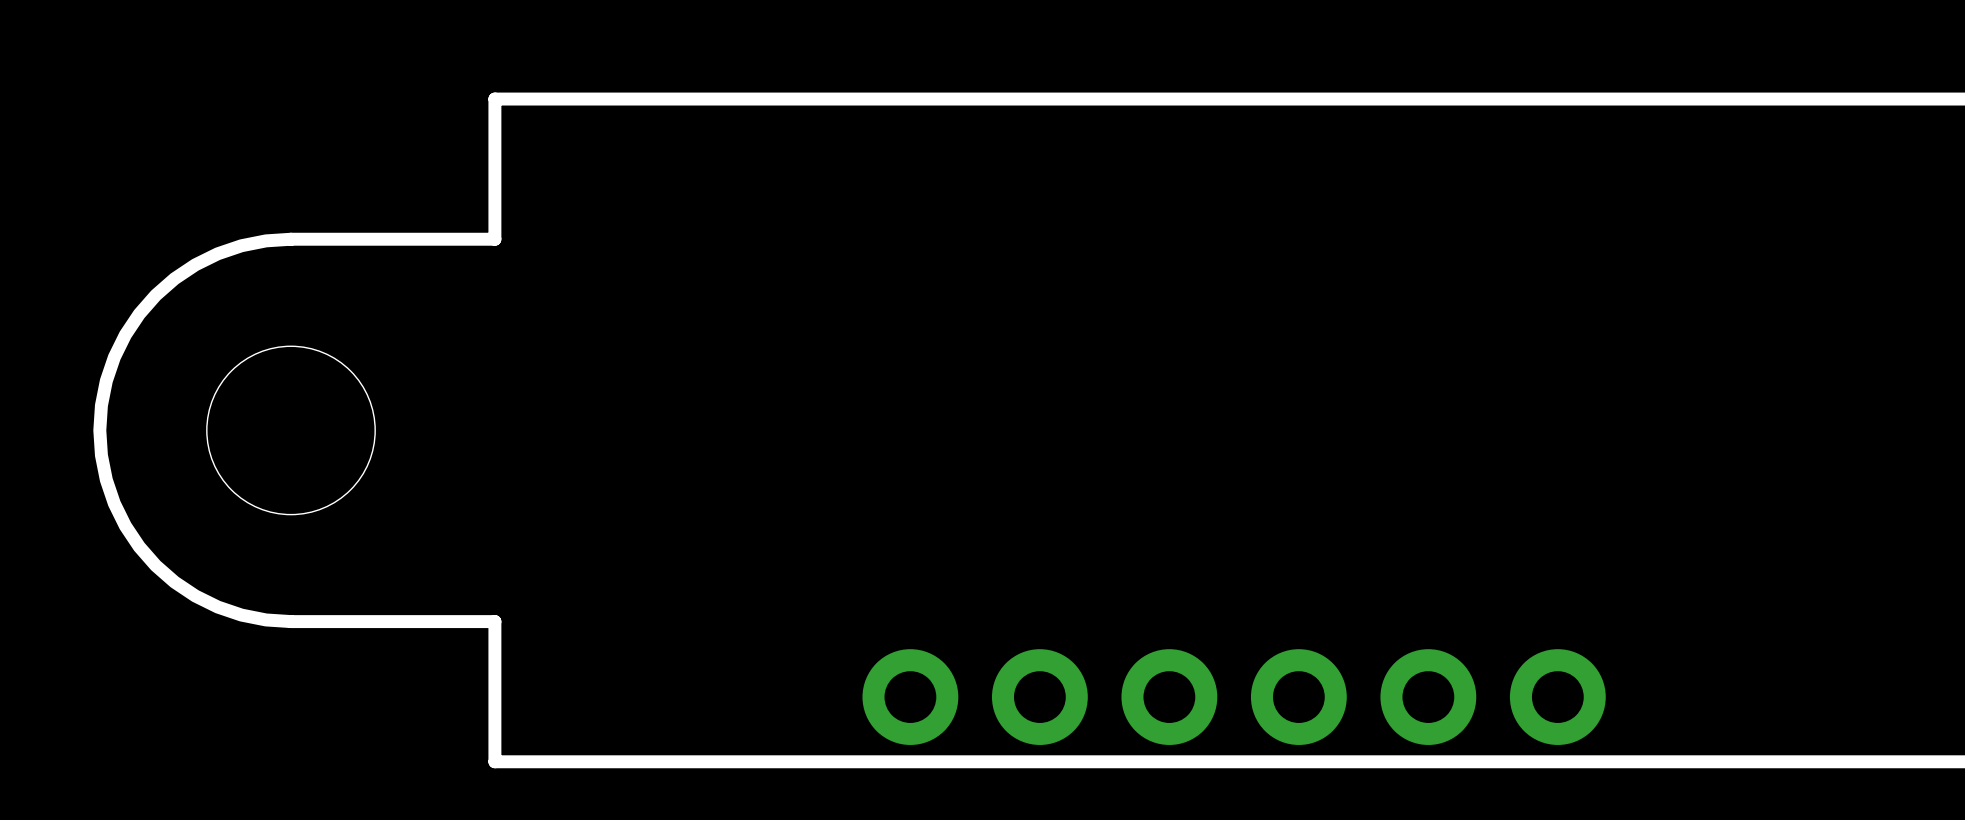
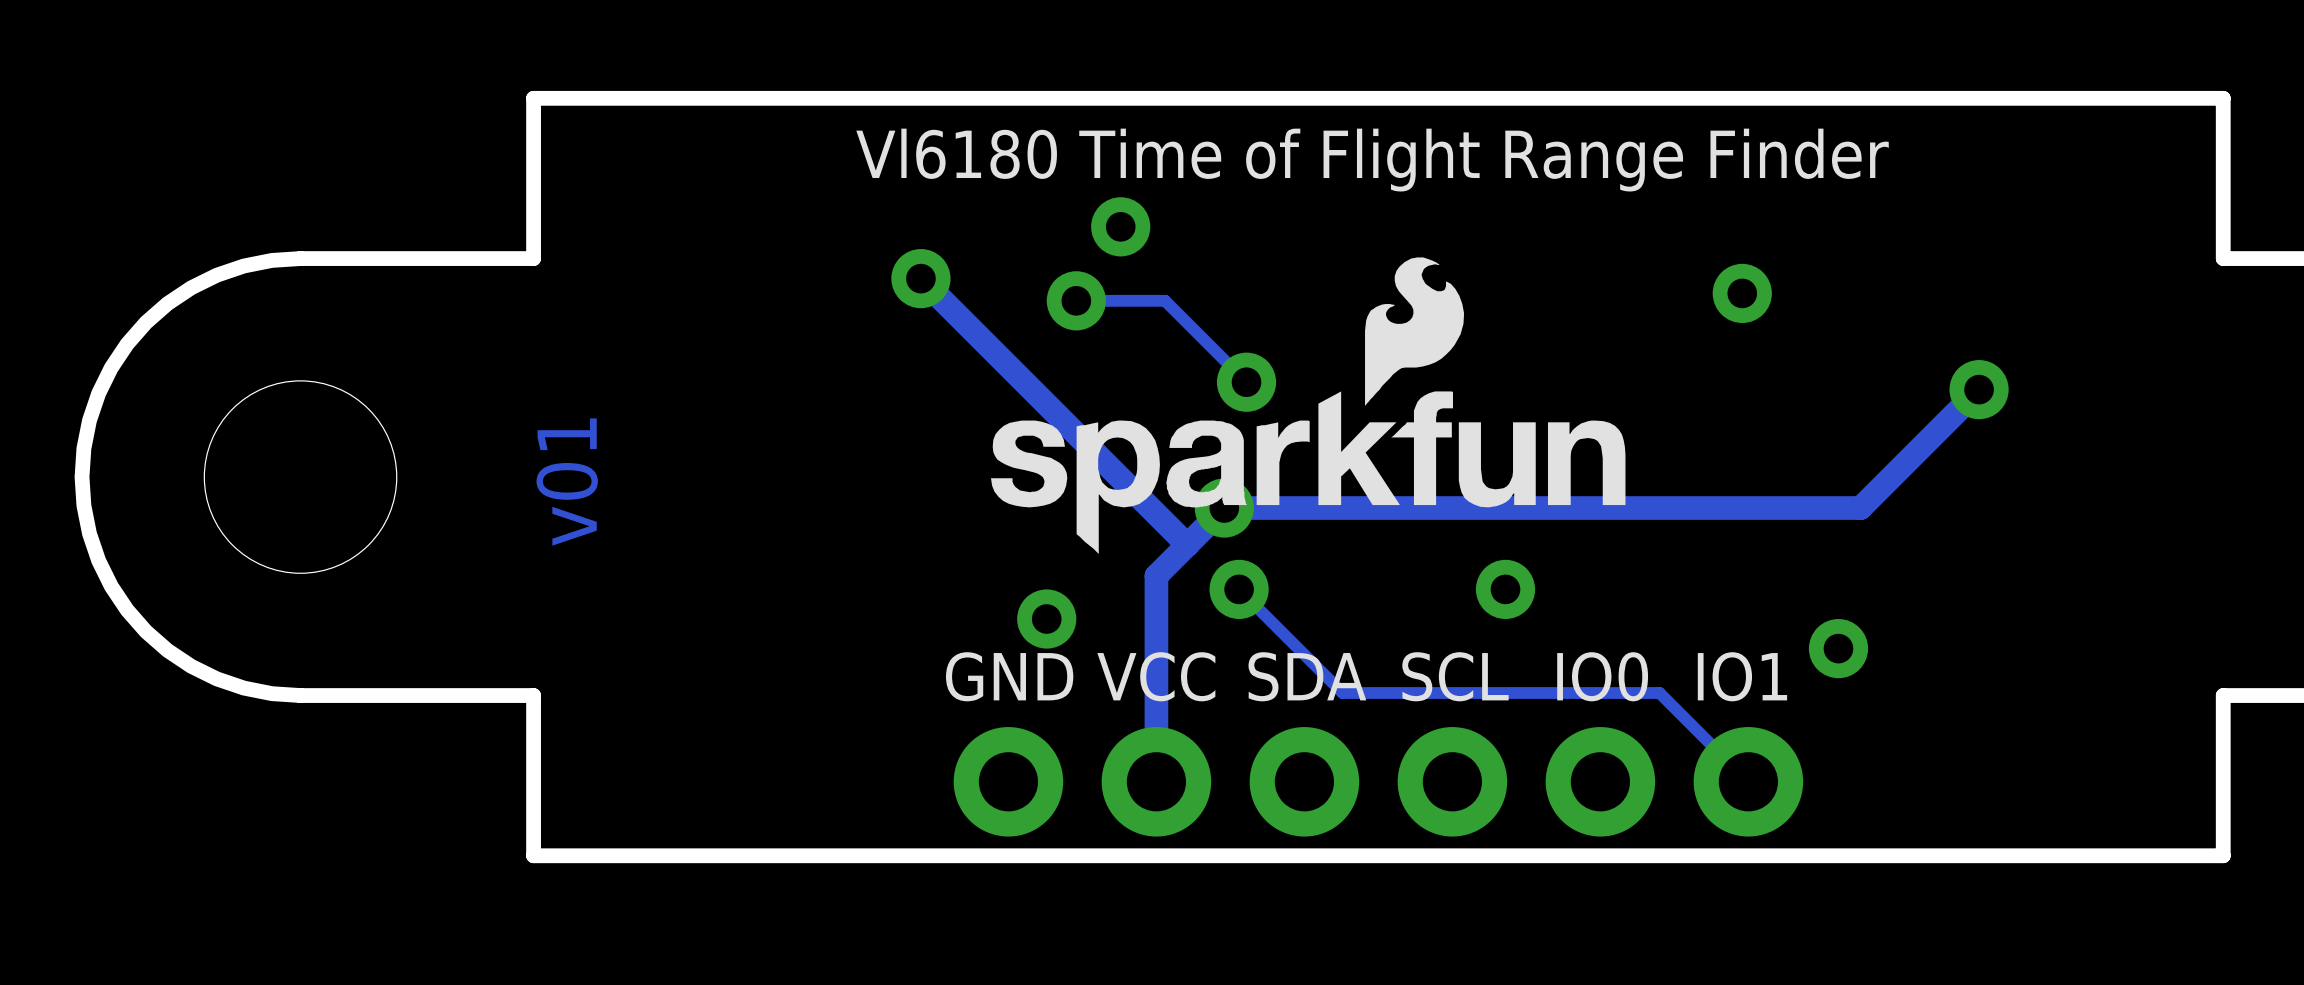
text: none -> Vl6180 Time of Flight Range Finder (1372, 160)
via: none -> (1120, 226)
drawing: none -> [990, 257, 1626, 554]
track: none -> (920, 278) (1187, 545)
via: none -> (920, 278)
via: none -> (1742, 293)
track: none -> (1076, 300) (1165, 300) (1246, 382)
via: none -> (1076, 300)
via: none -> (1246, 382)
track: none -> (1979, 389) (1860, 508) (1224, 508) (1156, 575) (1156, 781)
via: none -> (1979, 389)
text: none -> v01 (567, 482)
via: none -> (1224, 508)
track: none -> (1239, 589) (1342, 693) (1659, 693) (1748, 781)
via: none -> (1239, 589)
via: none -> (1505, 589)
via: none -> (1046, 619)
via: none -> (1838, 648)
text: none -> GND (1009, 676)
text: none -> VCC (1156, 676)
text: none -> SDA (1307, 676)
text: none -> SCL (1455, 676)
text: none -> IO0 (1602, 676)
text: none -> IO1 (1742, 676)

